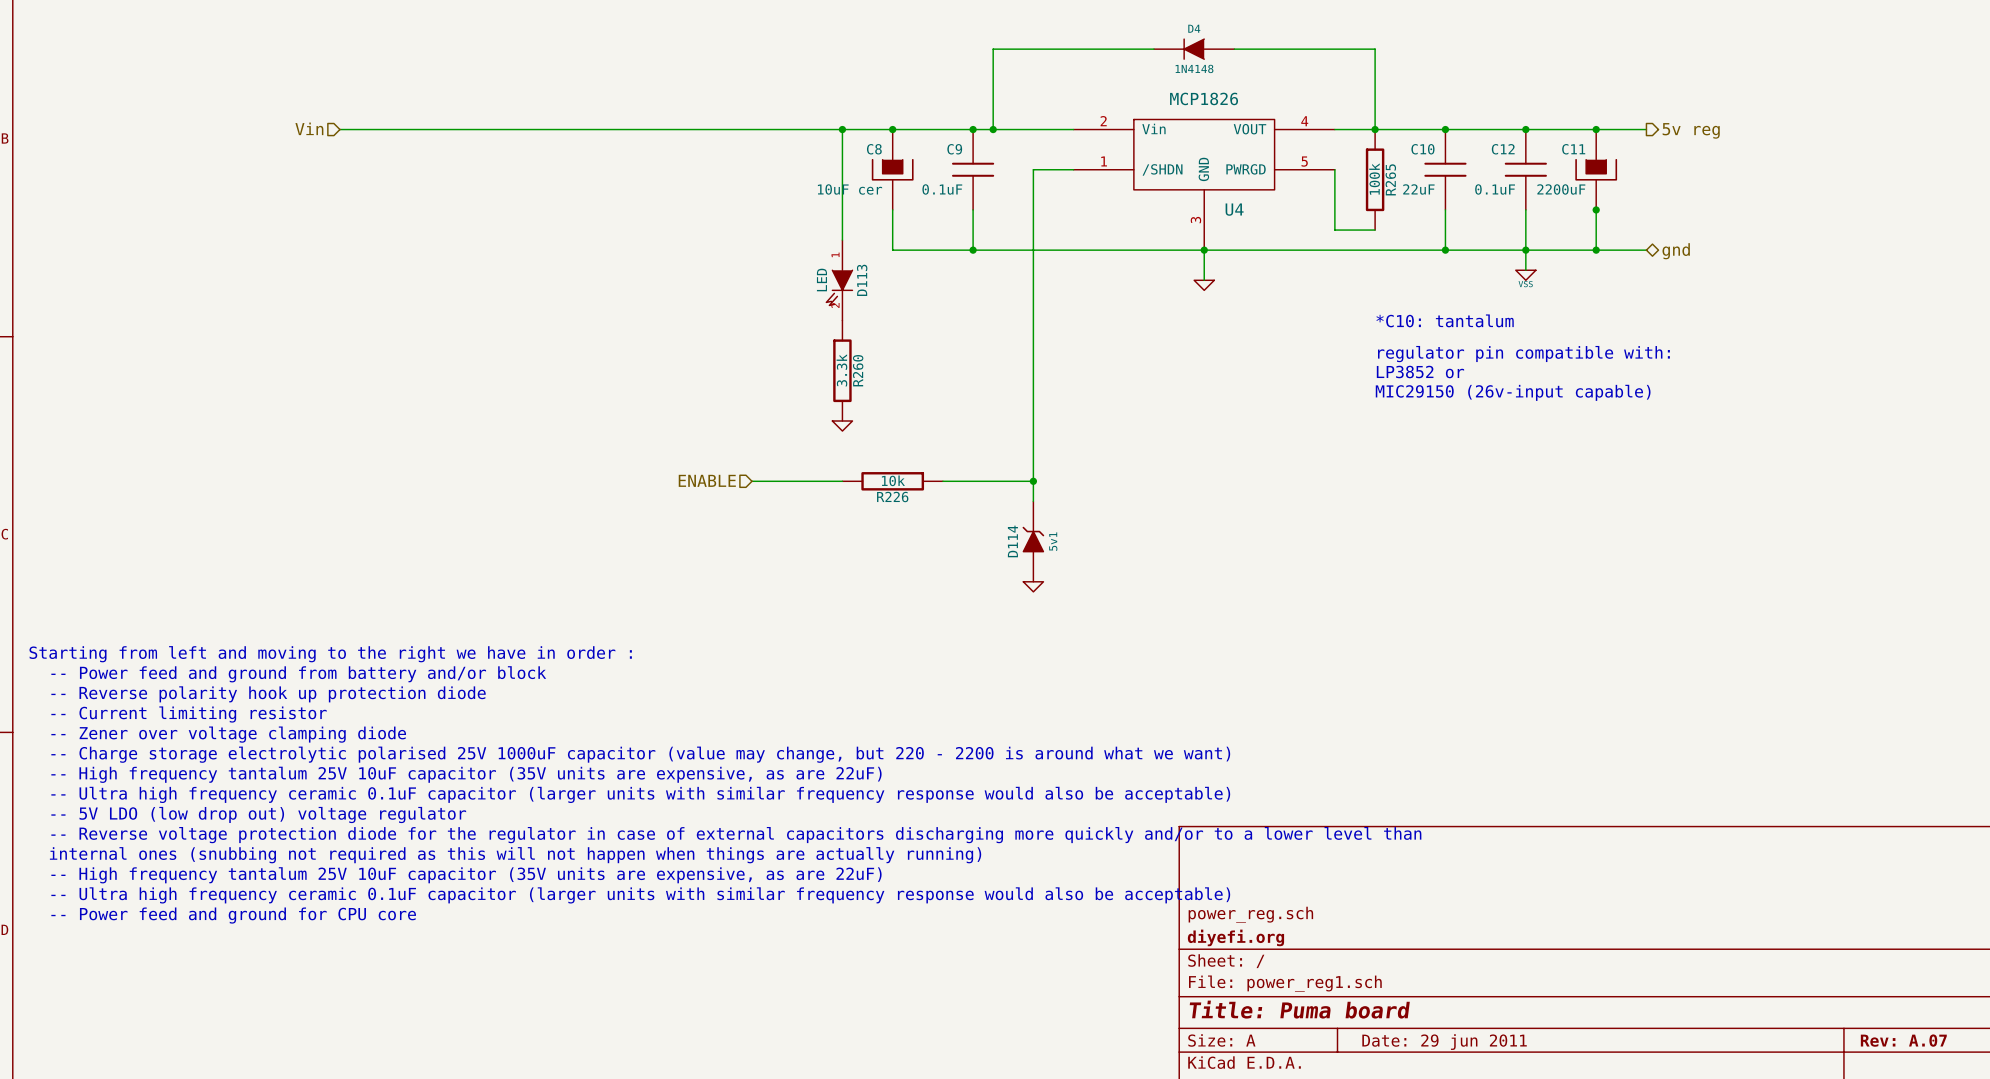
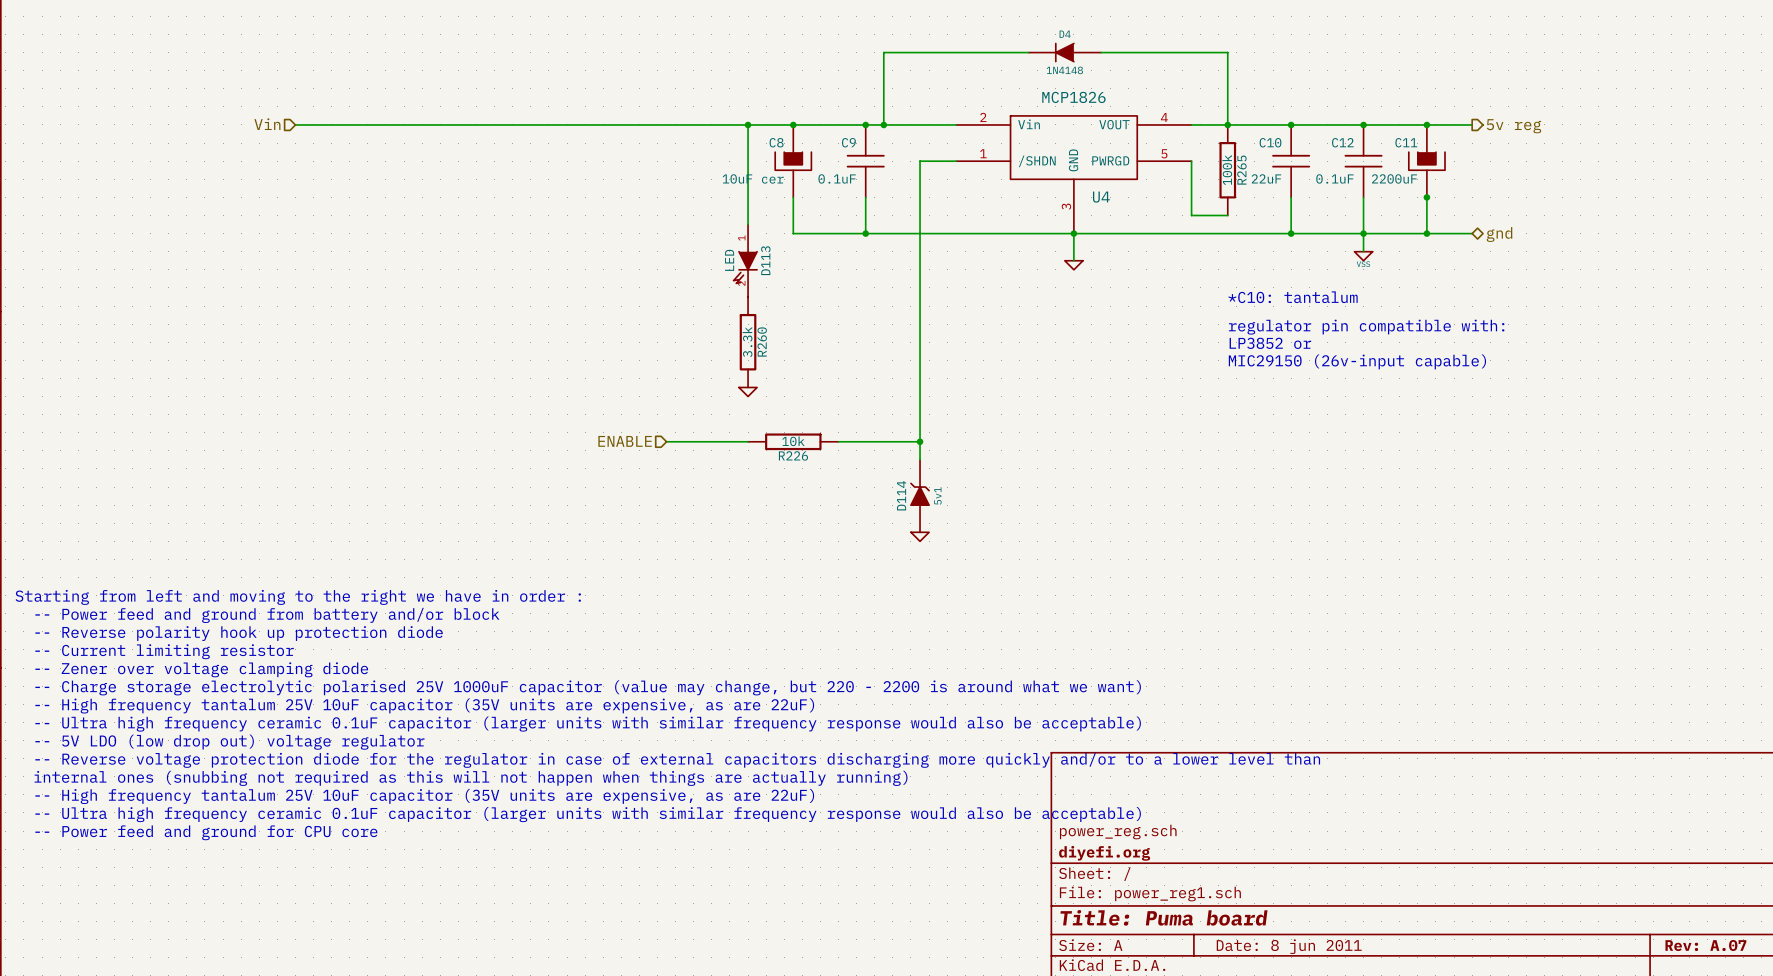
title block: Date: 29 jun 2011 (1444, 1042) -> Date: 8 jun 2011 (1289, 946)

